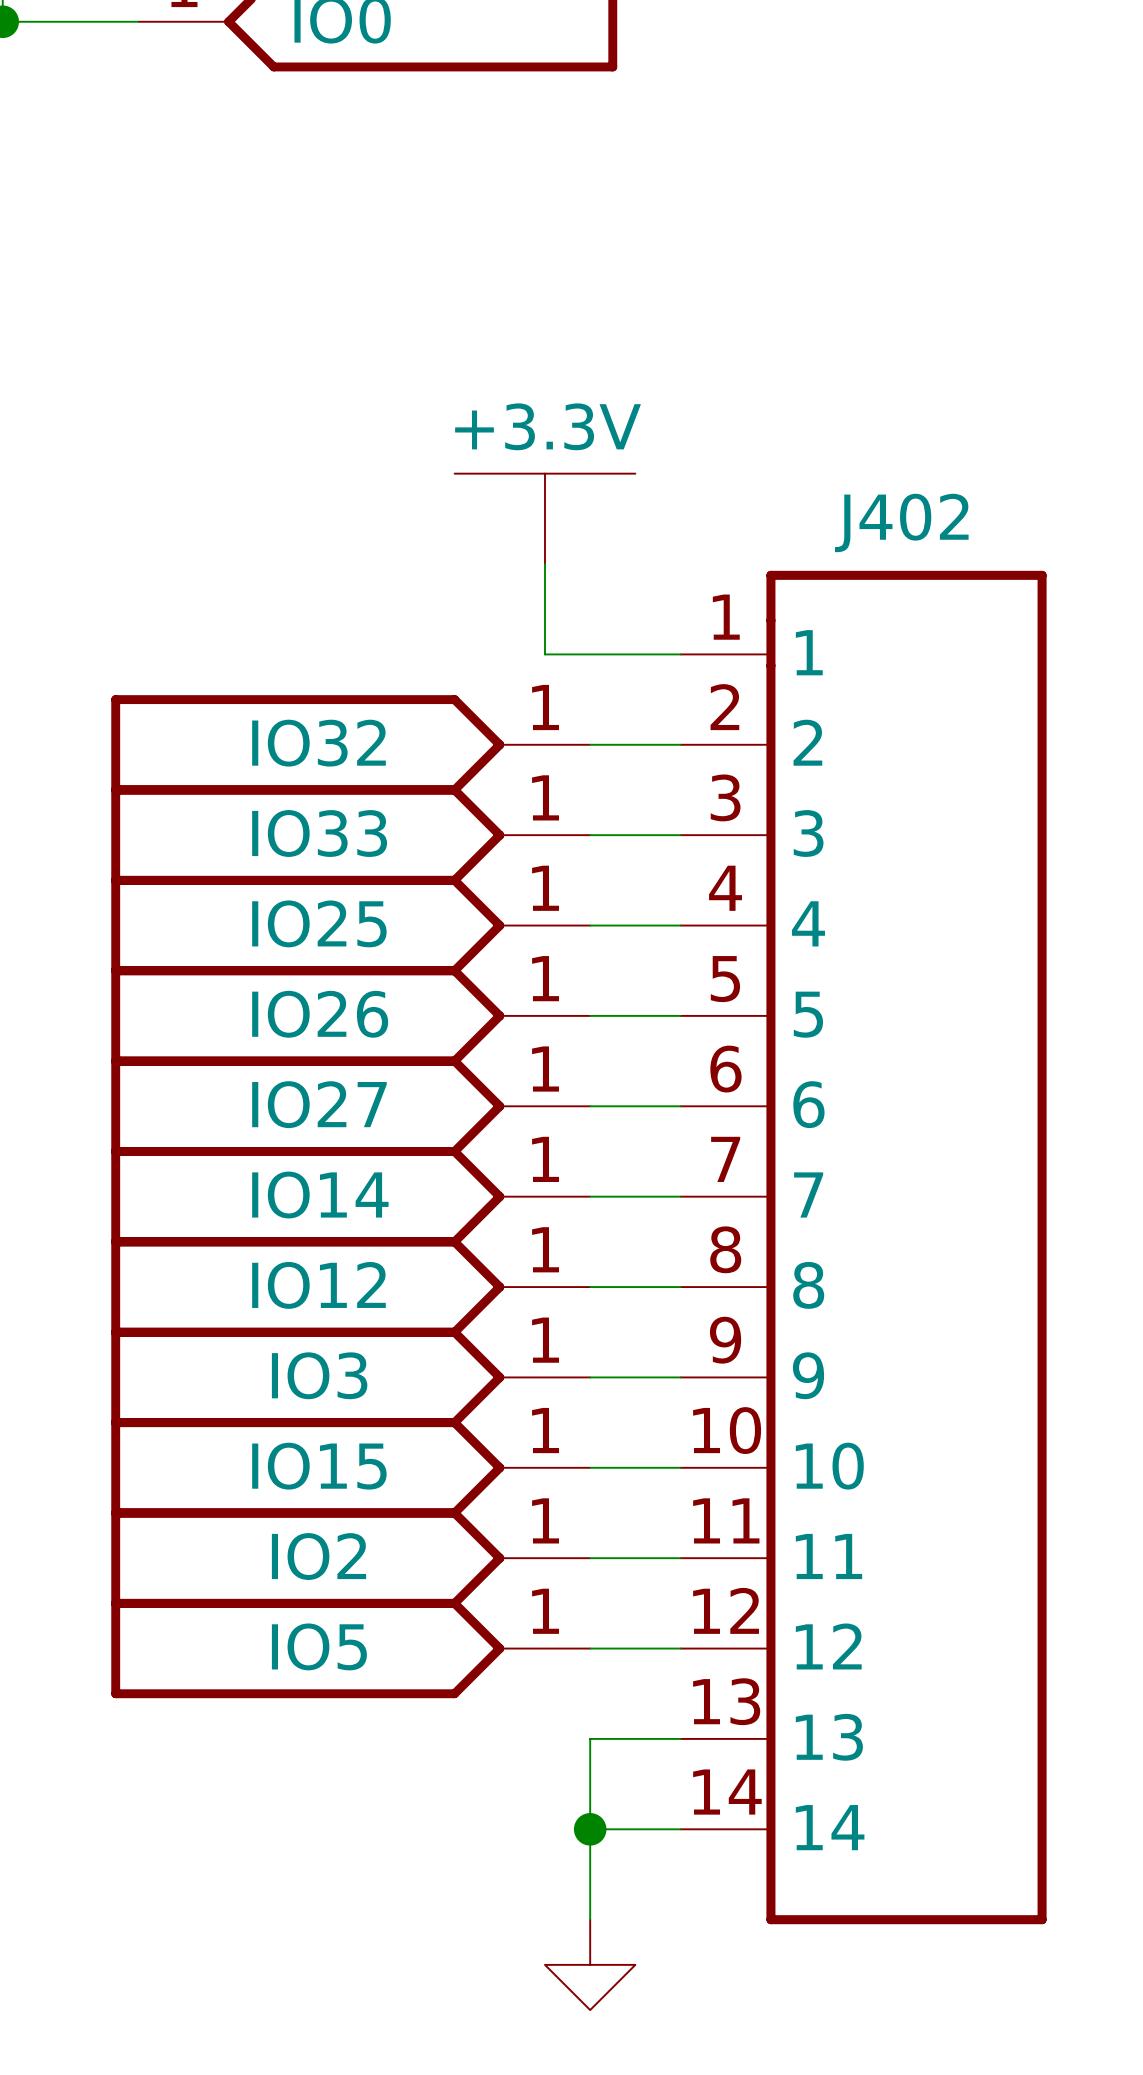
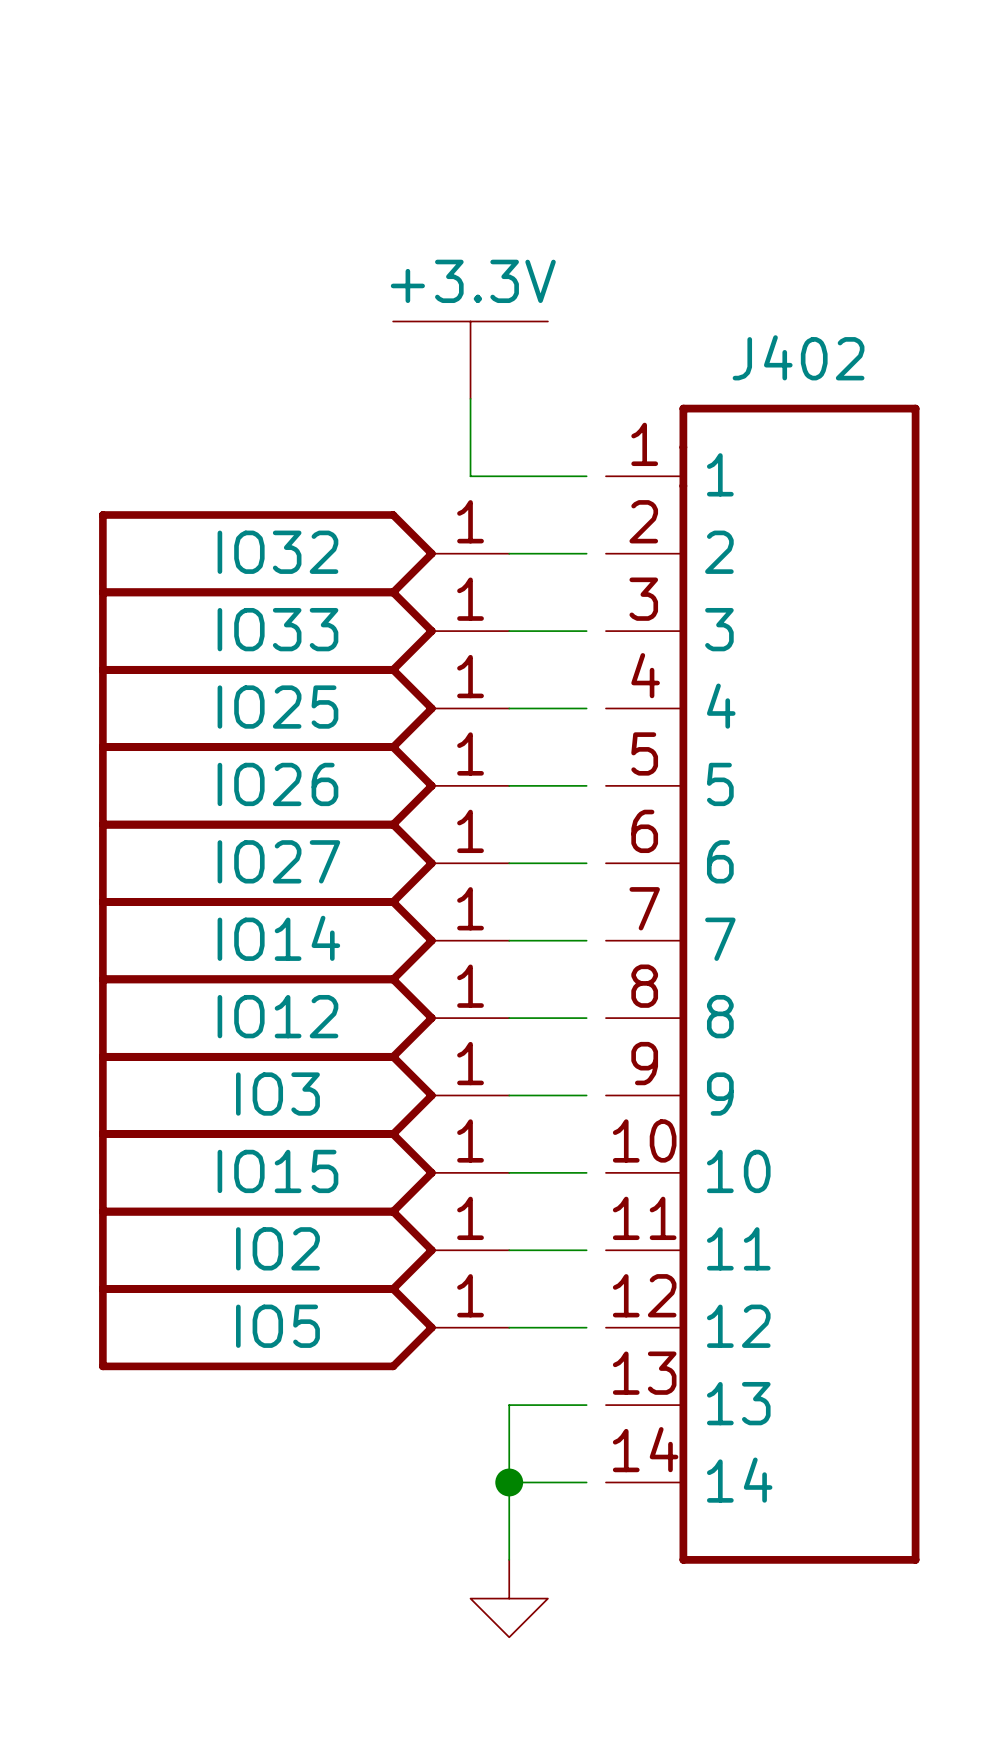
J402 position: (863, 1247) -> (762, 984)

